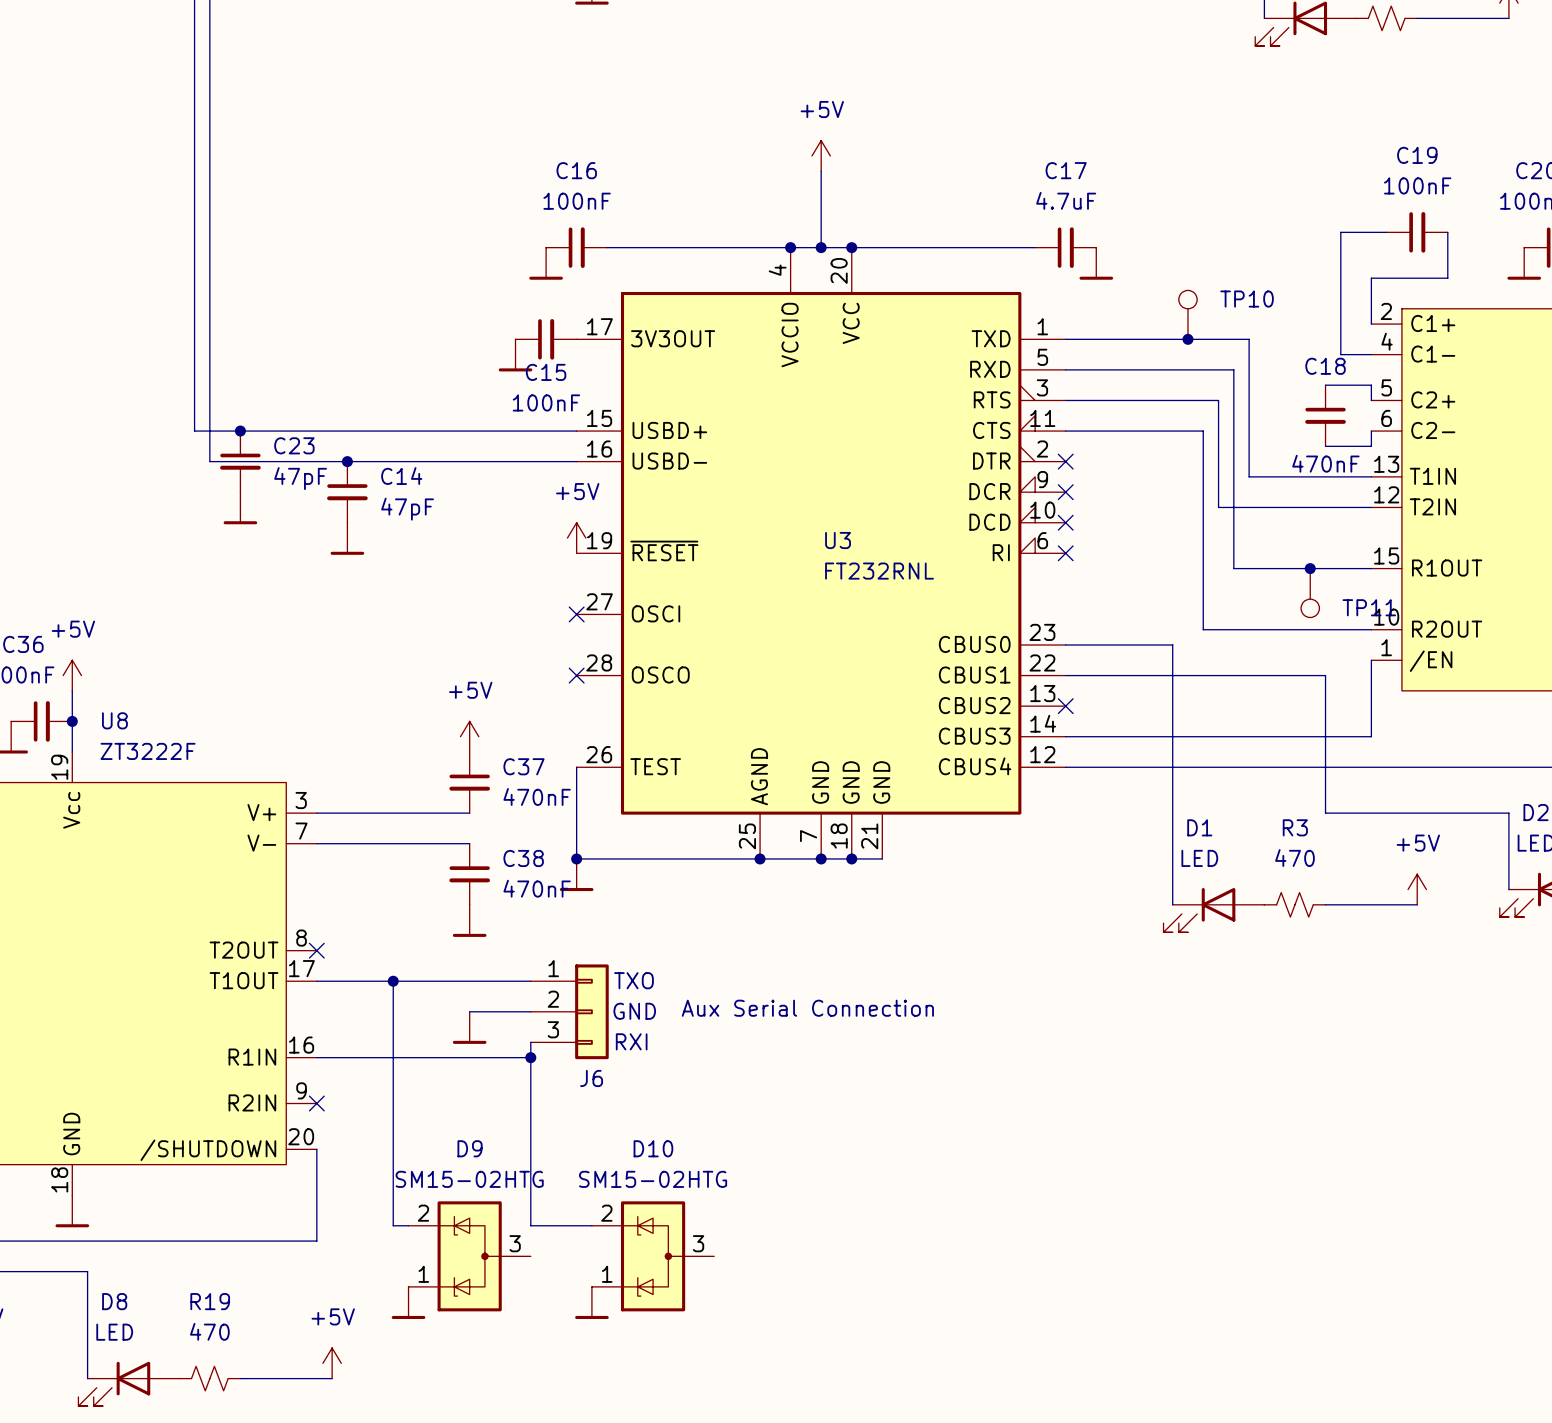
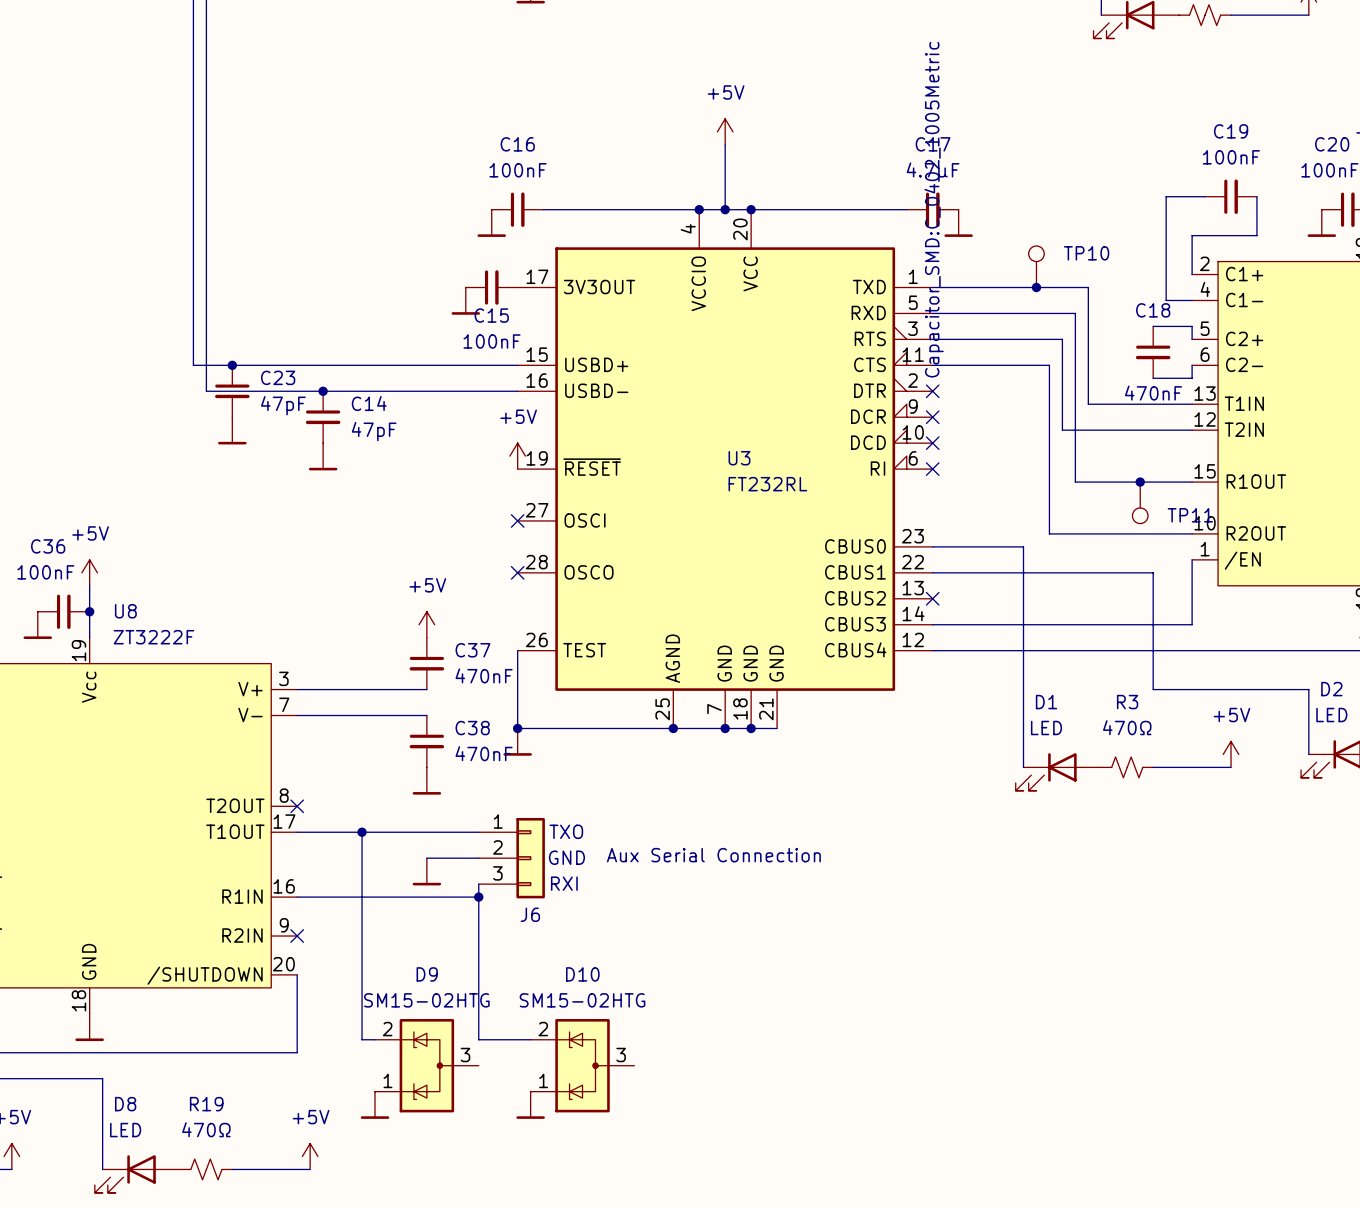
C17 value: 4.7uF (1066, 200) -> 4.7µF (933, 172)
C17 text: none -> Capacitor_SMD:C_0402_1005Metric (934, 209)
U3 value: FT232RNL (879, 571) -> FT232RL (767, 484)
R3 value: 470 (1294, 858) -> 470Ω (1127, 727)
R19 value: 470 (209, 1331) -> 470Ω (206, 1129)

